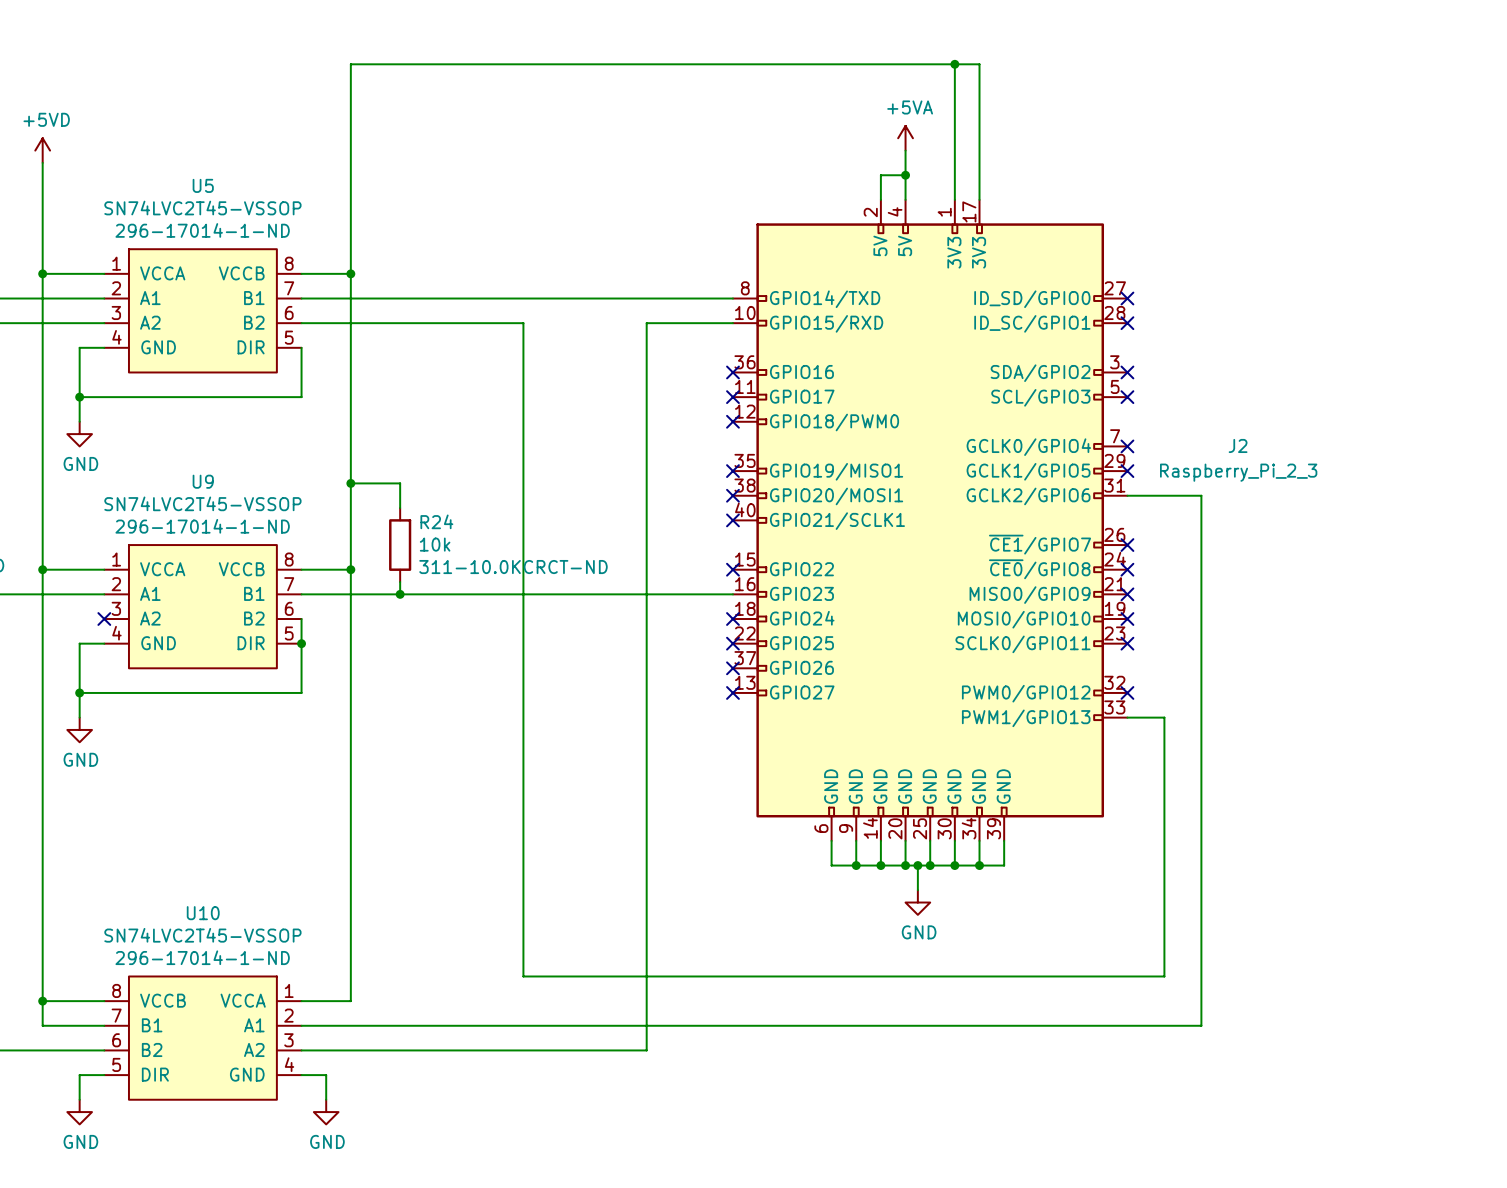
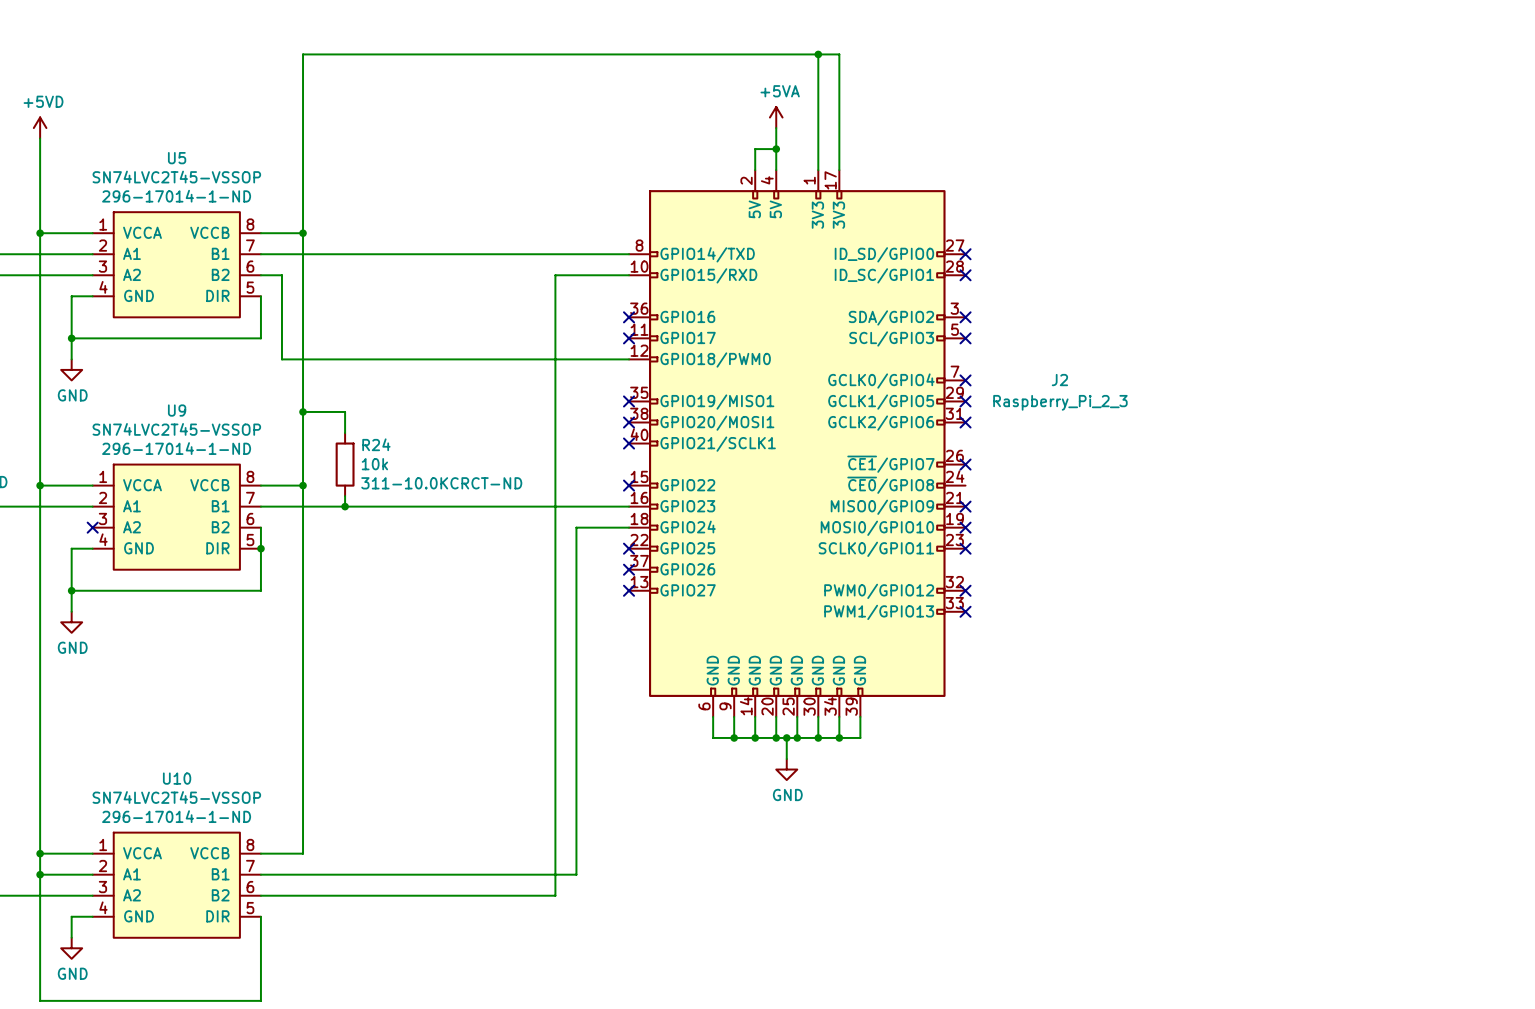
wire: (326, 323) (523, 323) (523, 976) (1164, 976) (1164, 717) (1127, 717) -> (281, 275) (281, 359) (629, 359)
no-connect mark: (732, 421) -> none
wire: (1127, 495) (1201, 495) (1201, 1025) (671, 1025) -> (629, 527) (576, 527) (576, 874)
no-connect mark: none -> (965, 422)
no-connect mark: (1127, 569) -> none
no-connect mark: (732, 619) -> none
no-connect mark: none -> (965, 611)
junction: none -> (40, 874)
U10 flip: as is (202, 1038) -> left-right (176, 885)
wire: (301, 1075) (326, 1075) (326, 1099) -> (260, 916) (260, 1000) (40, 1000) (40, 874)
power symbol: GND (326, 1112) -> none

